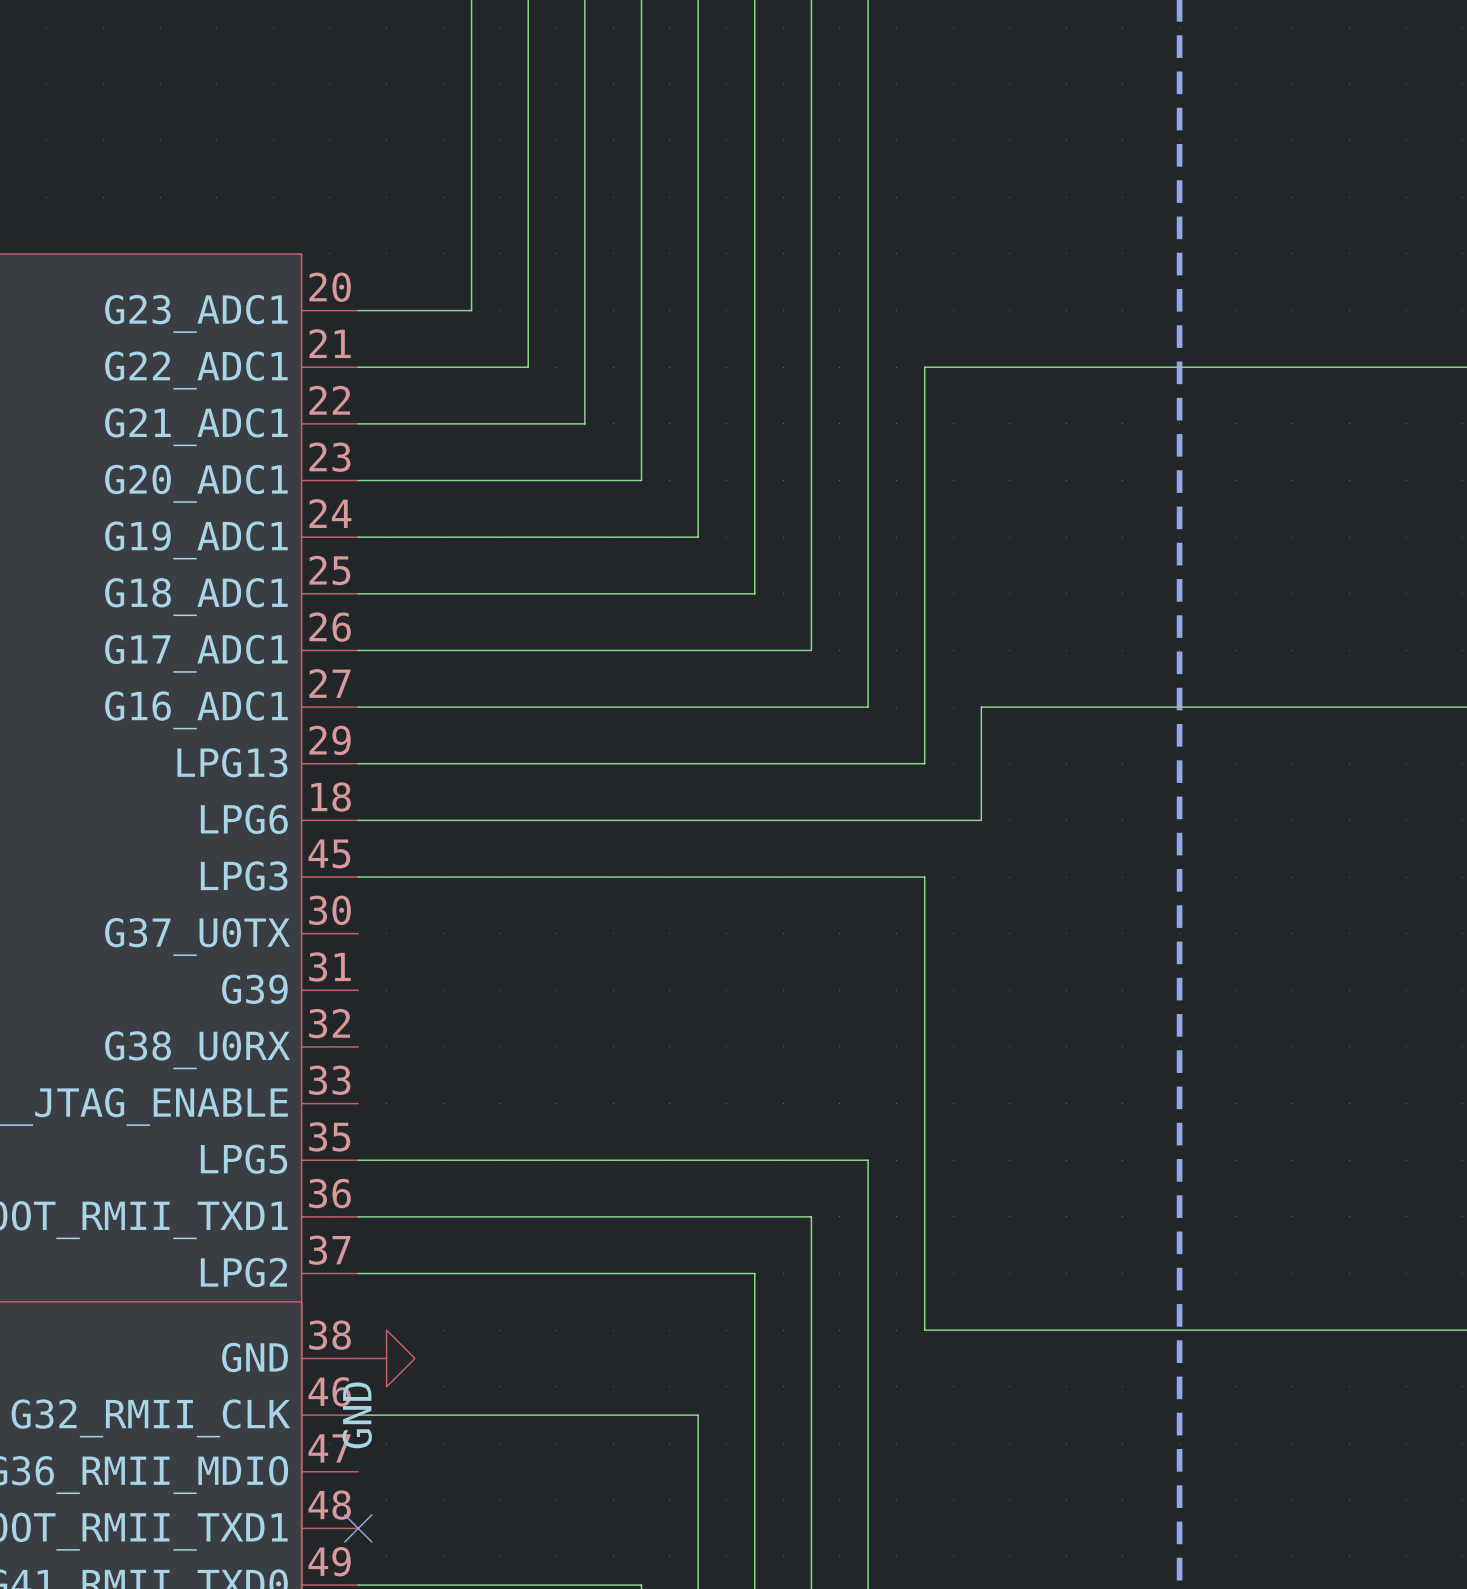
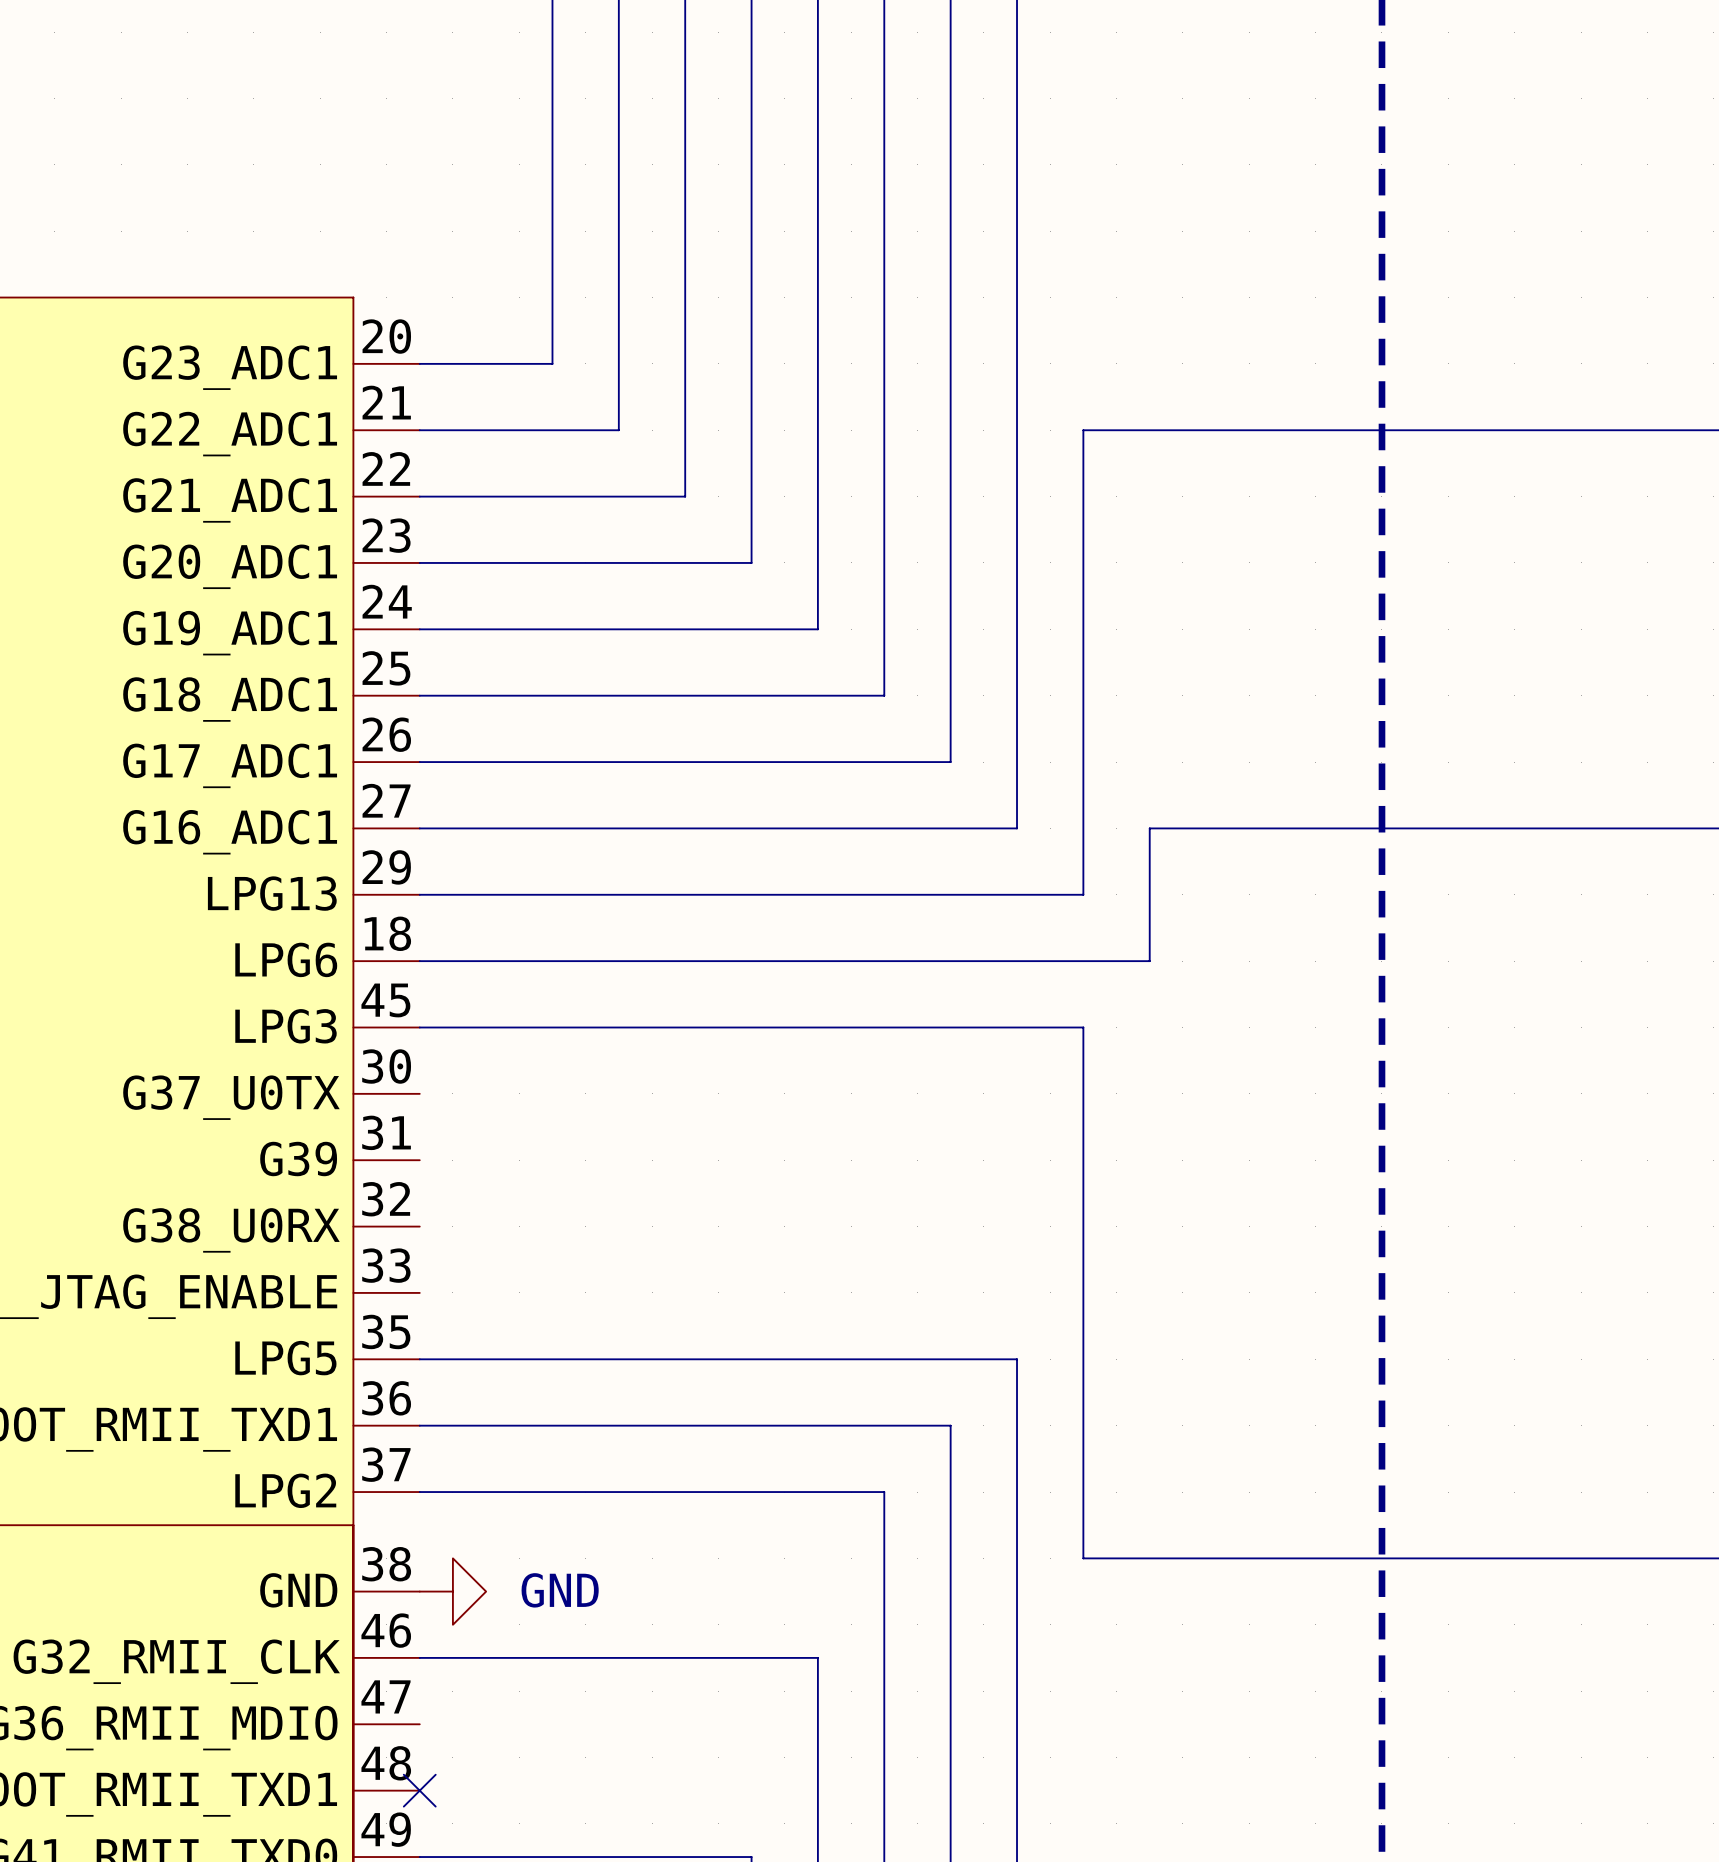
power symbol text rotation: 0° (357, 1415) -> 90° clockwise (560, 1590)
power symbol text position: GND (357, 1415) -> GND (560, 1590)

